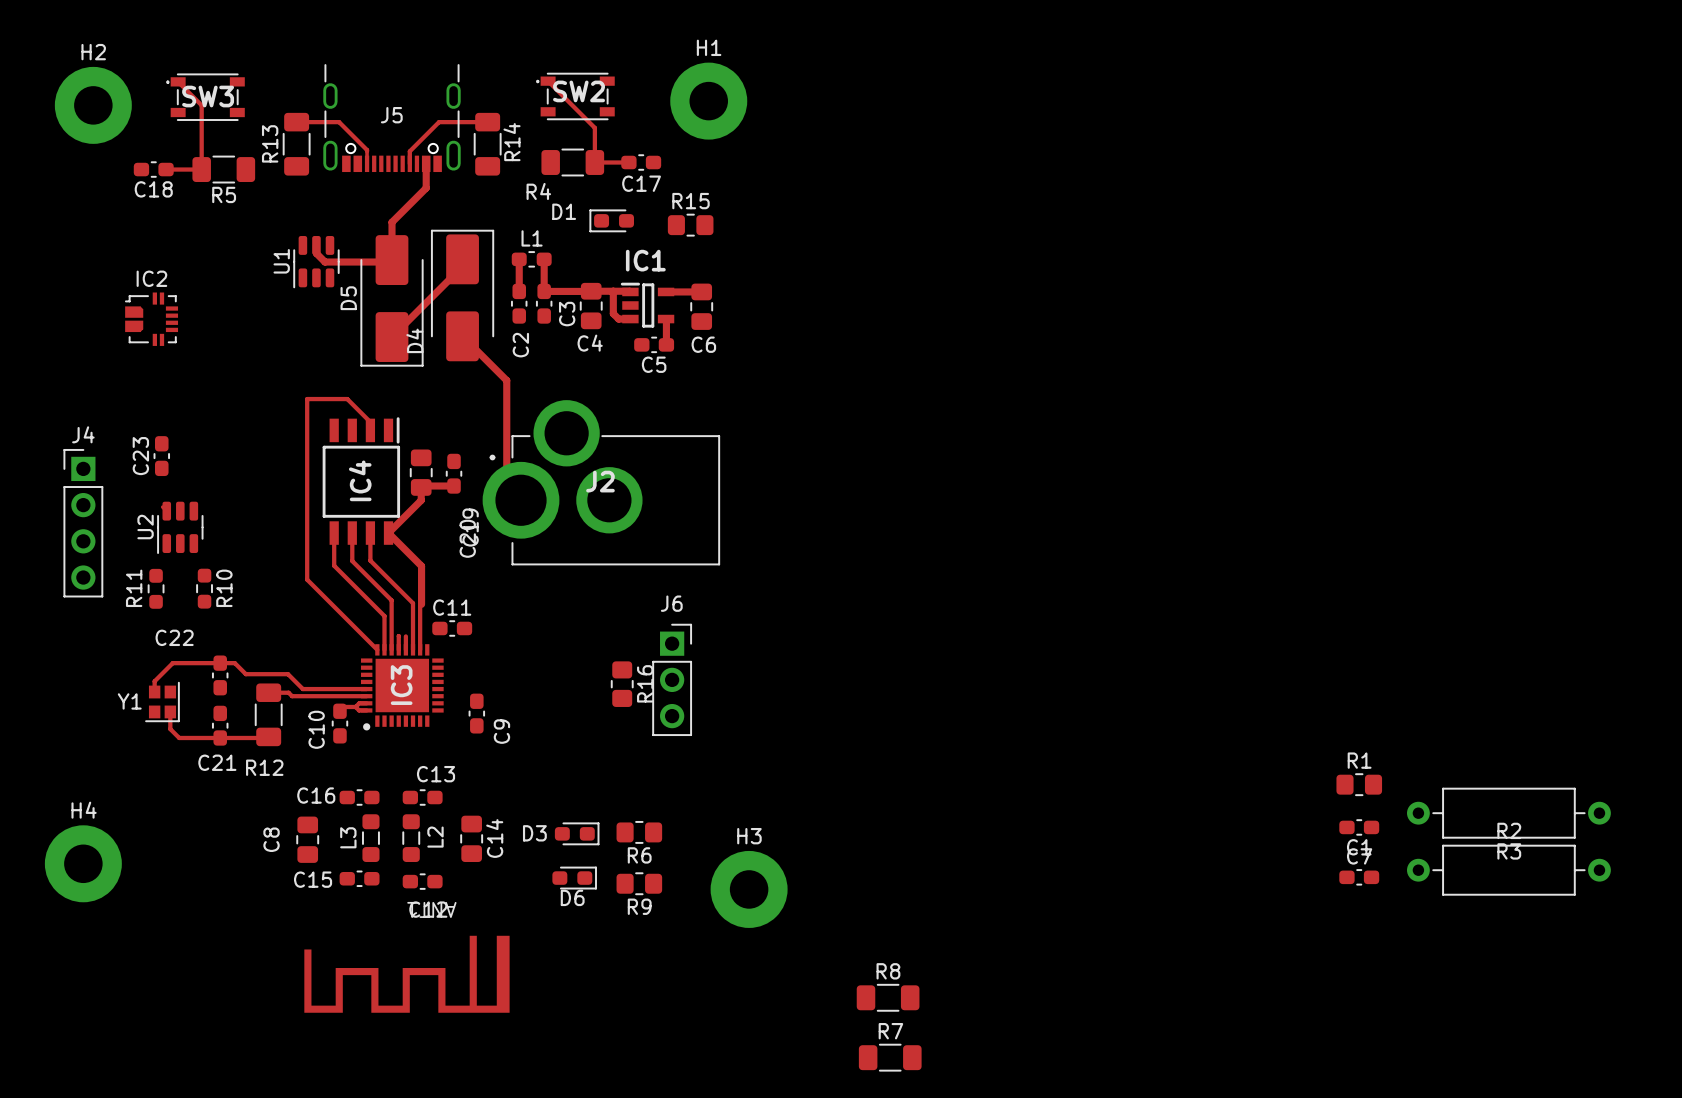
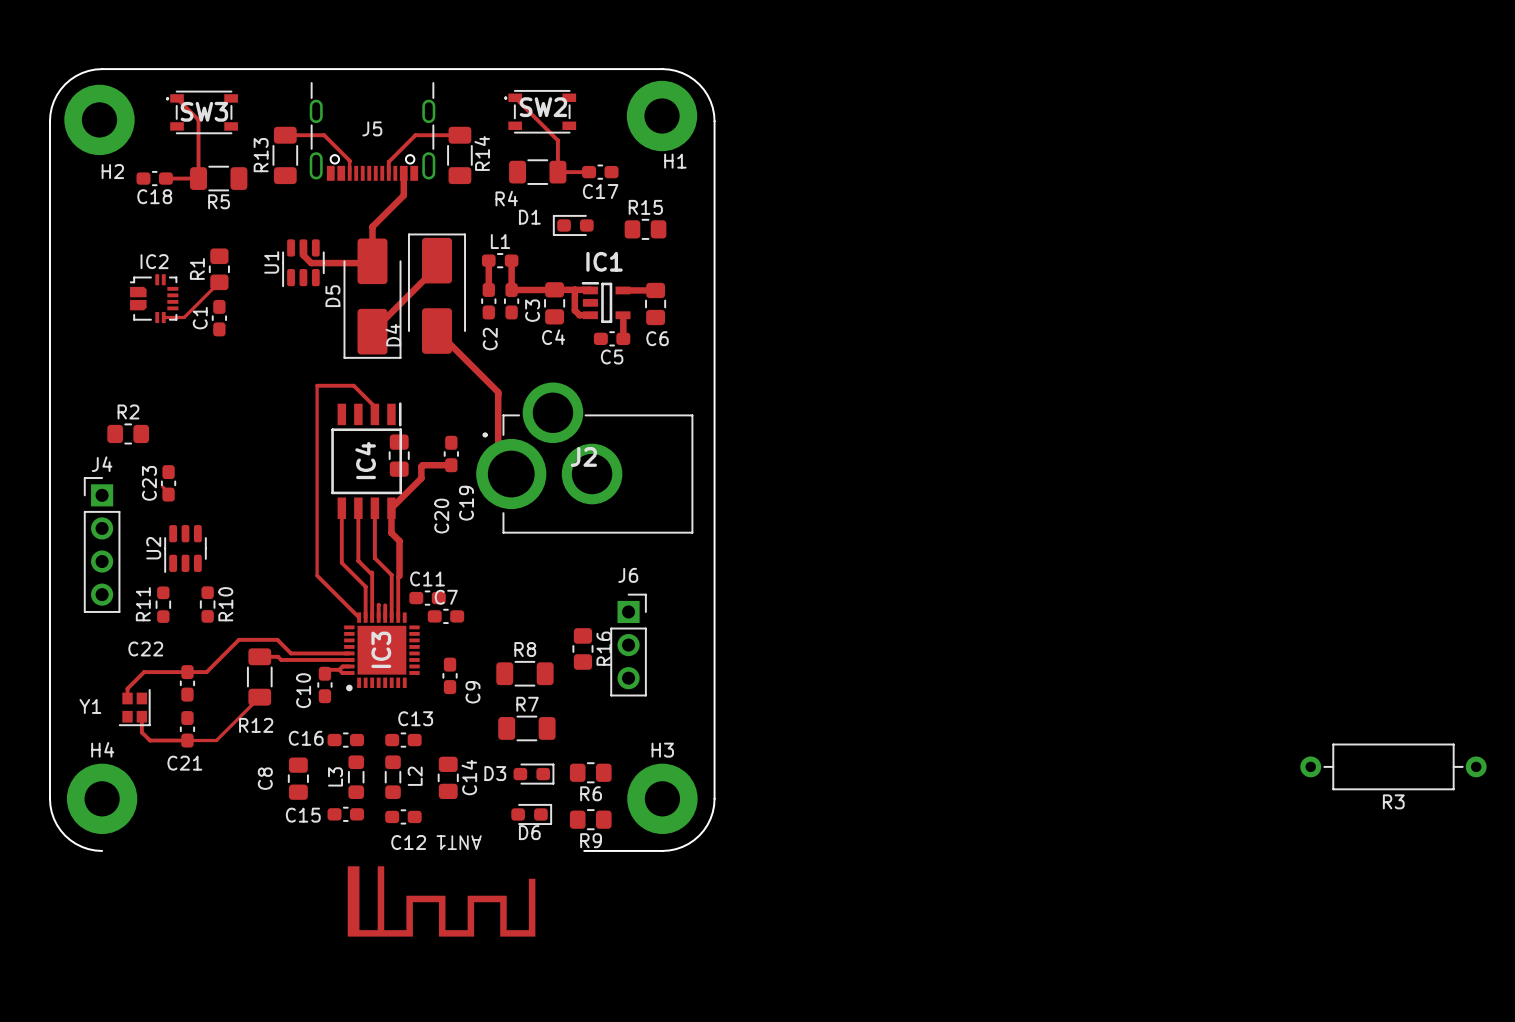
H1 name position: H1 (709, 47) -> H1 (675, 161)
H2 name position: H2 (93, 52) -> H2 (112, 171)
track: none -> (219, 282) (184, 317) (163, 317)
IC2 position: (151, 319) -> (154, 298)
track: (506, 380) (506, 498) -> (477, 371) (498, 392) (498, 472)
track: (370, 430) (370, 422) (347, 399) (307, 399) (307, 579) (331, 603) -> (374, 414) (374, 406) (353, 385) (317, 385) (317, 575)
C23 position: (161, 456) -> (168, 483)
C19 position: (454, 473) -> (451, 454)
IC4 position: (361, 481) -> (366, 460)
J2 position: (601, 482) -> (584, 457)
track: (454, 486) (422, 486) (421, 500) (388, 533) (412, 557) -> (451, 465) (421, 466) (421, 478) (391, 508) (391, 533)
J4 position: (83, 523) -> (102, 544)
U2 position: (180, 527) -> (185, 548)
track: none -> (356, 509) (358, 508) (358, 560) (372, 574)
track: (334, 533) (334, 565) (358, 590) -> (341, 508) (341, 562)
track: (370, 533) (370, 560) (394, 584) -> (374, 508) (374, 558)
track: (350, 534) (352, 533) (352, 561) (391, 600) -> none
R11 position: (156, 588) -> (163, 604)
R10 position: (204, 588) -> (207, 604)
track: (245, 674) (234, 663) (172, 663) (154, 681) (154, 692) -> (238, 639) (206, 672) (144, 672) (127, 688) (127, 698)
C22 position: (220, 675) -> (187, 683)
Y1 name position: Y1 (129, 701) -> Y1 (90, 706)
Y1 position: (162, 701) -> (134, 707)
track: (170, 711) (170, 729) (179, 737) (266, 737) -> none
C21 position: (220, 725) -> (187, 729)
track: none -> (259, 697) (216, 740) (149, 740) (141, 732) (141, 716)
R1 name position: R1 (1359, 760) -> R1 (197, 268)
R1 rotation: 0° (1359, 784) -> 90° clockwise (219, 269)
R1 position: (1359, 784) -> (219, 269)
C16 position: (359, 797) -> (345, 740)
C13 position: (422, 797) -> (403, 740)
C1 rotation: 0° (1359, 827) -> 90° clockwise (219, 318)
C1 position: (1359, 827) -> (219, 318)
R6 position: (639, 832) -> (590, 772)
D3 position: (577, 833) -> (533, 774)
L3 position: (370, 838) -> (356, 777)
L2 position: (411, 838) -> (393, 777)
C14 position: (471, 838) -> (448, 777)
C8 position: (307, 839) -> (298, 778)
R2 footprint: [1407, 844, 1611, 896] -> [107, 423, 150, 445]
H4 position: (83, 863) -> (102, 798)
C7 position: (1359, 877) -> (445, 616)
C15 position: (359, 878) -> (345, 814)
D6 position: (574, 878) -> (531, 814)
C12 position: (422, 881) -> (403, 816)
R9 position: (639, 883) -> (590, 819)
H3 position: (749, 889) -> (662, 798)
board edge: none -> (102, 850) (82, 846) (65, 835) (53, 818) (49, 798) (49, 121) (51, 107) (60, 89) (70, 79) (82, 73) (102, 69) (669, 69) (688, 76) (703, 89) (712, 107) (714, 121) (714, 805) (710, 818) (703, 830) (694, 840) (682, 846) (662, 850) (584, 850)
ANT1 footprint: [304, 935, 510, 1013] -> [347, 866, 536, 937]
R8 position: (888, 997) -> (524, 673)
R7 position: (890, 1057) -> (526, 728)

